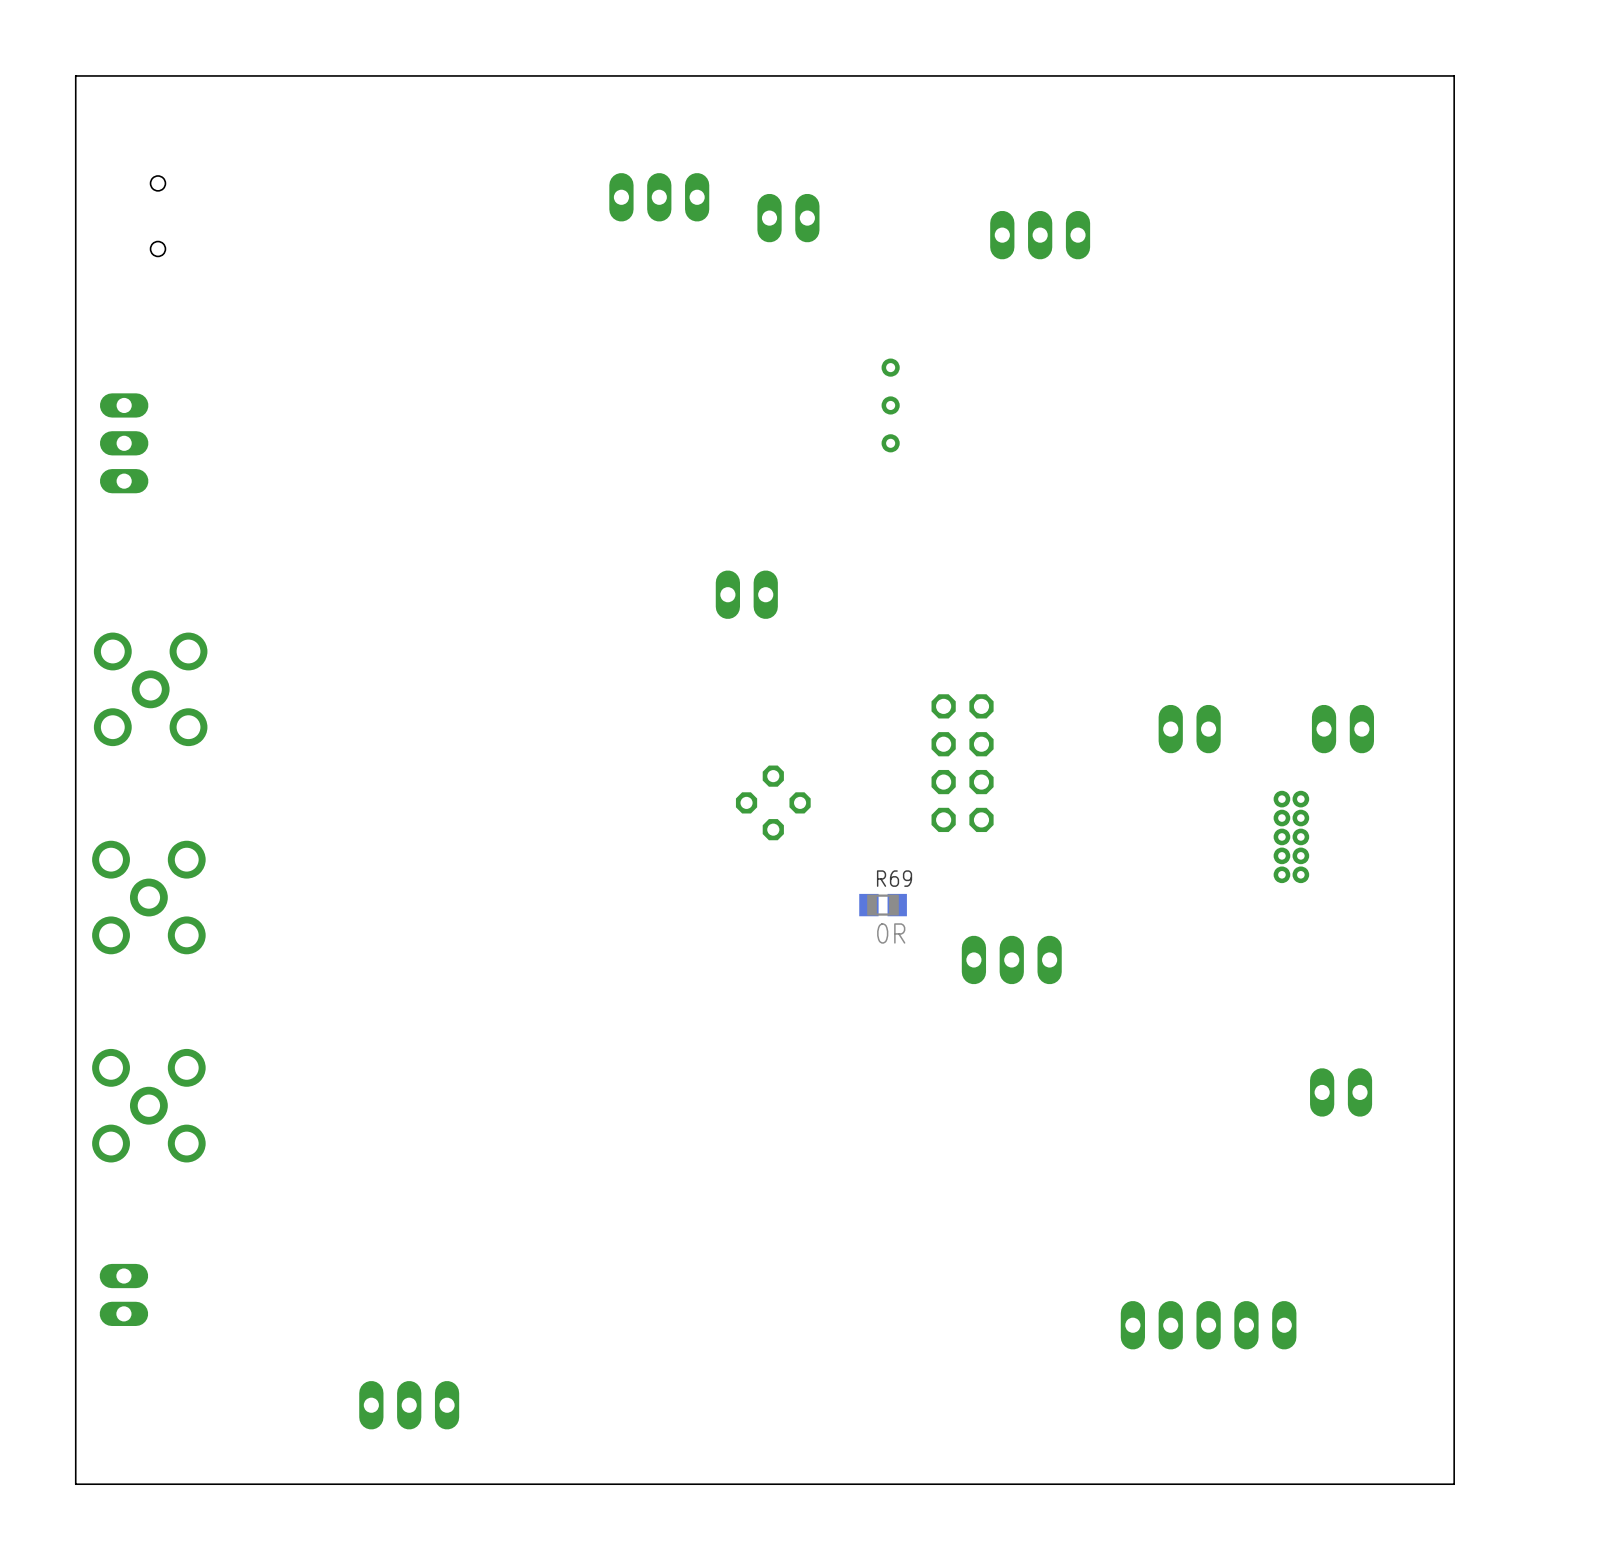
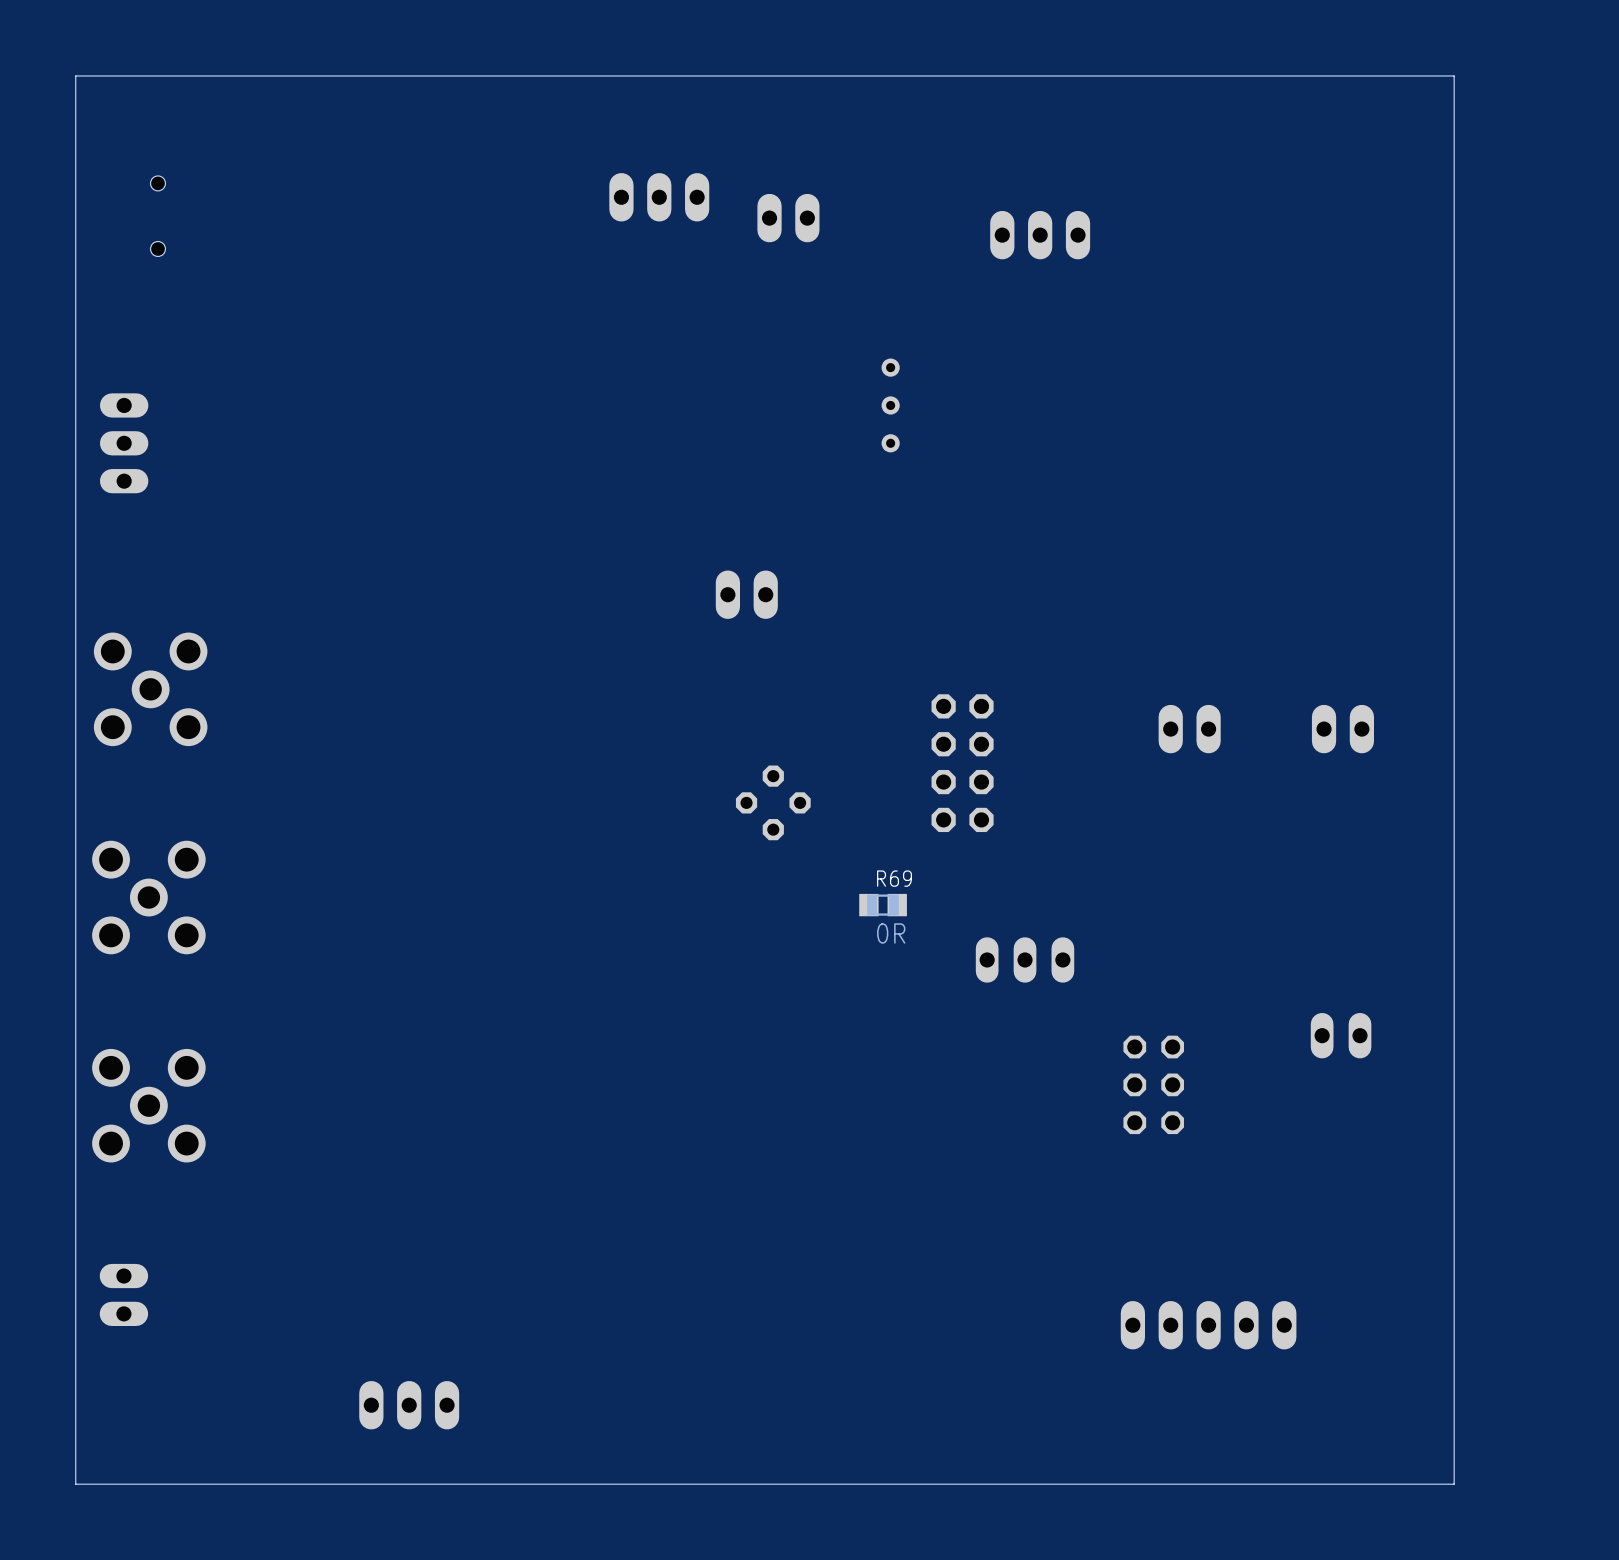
part: (1291, 836) -> none
part footprint: [961, 935, 1062, 985] -> [975, 937, 1075, 983]
part: none -> (1341, 1035)
part: none -> (1153, 1084)
part: (1341, 1092) -> none

